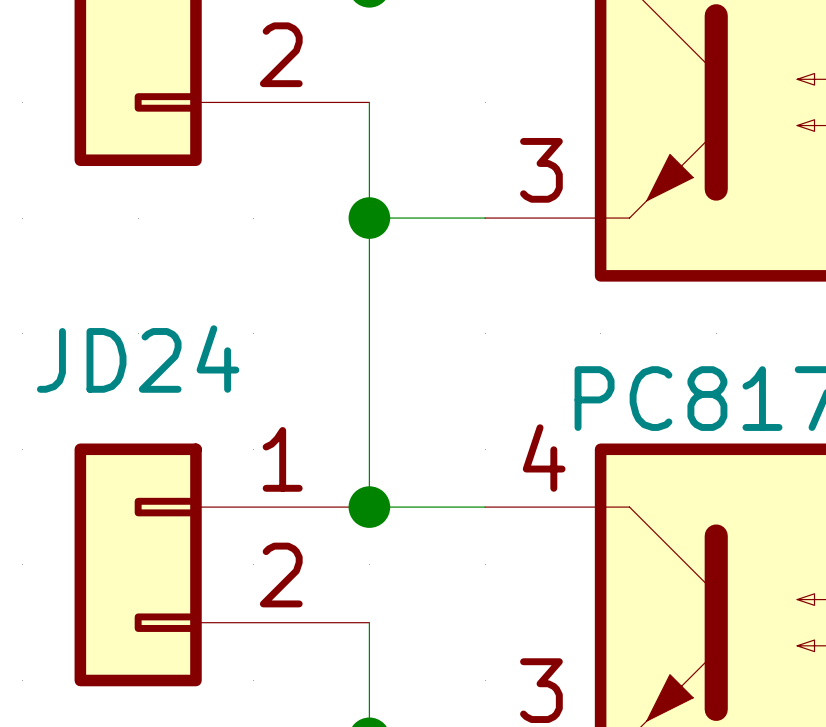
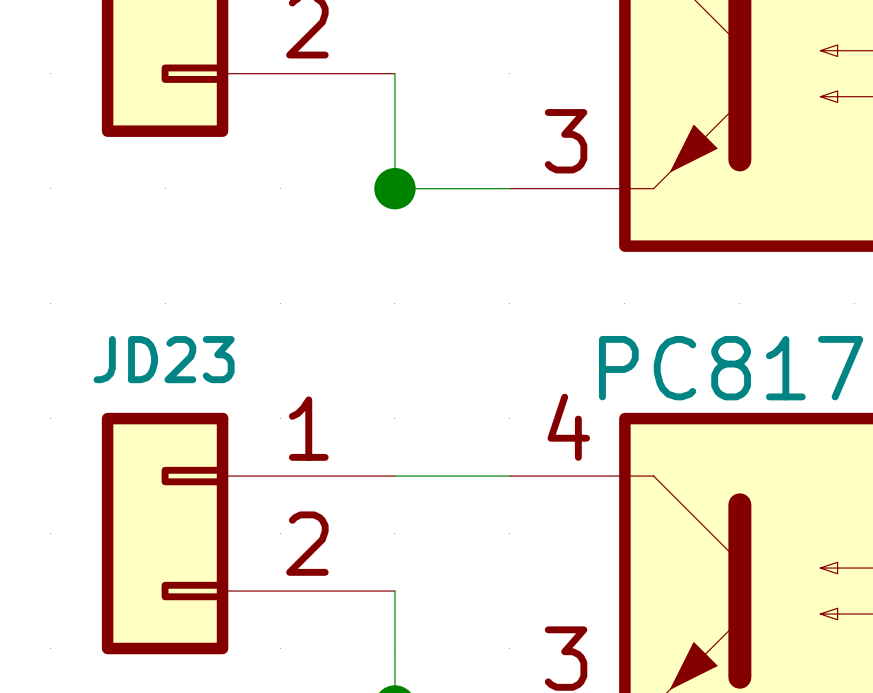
wire: (369, 218) (369, 507) -> none
JD24 name: JD24 (138, 359) -> JD23 (164, 359)
junction: (369, 507) -> none

